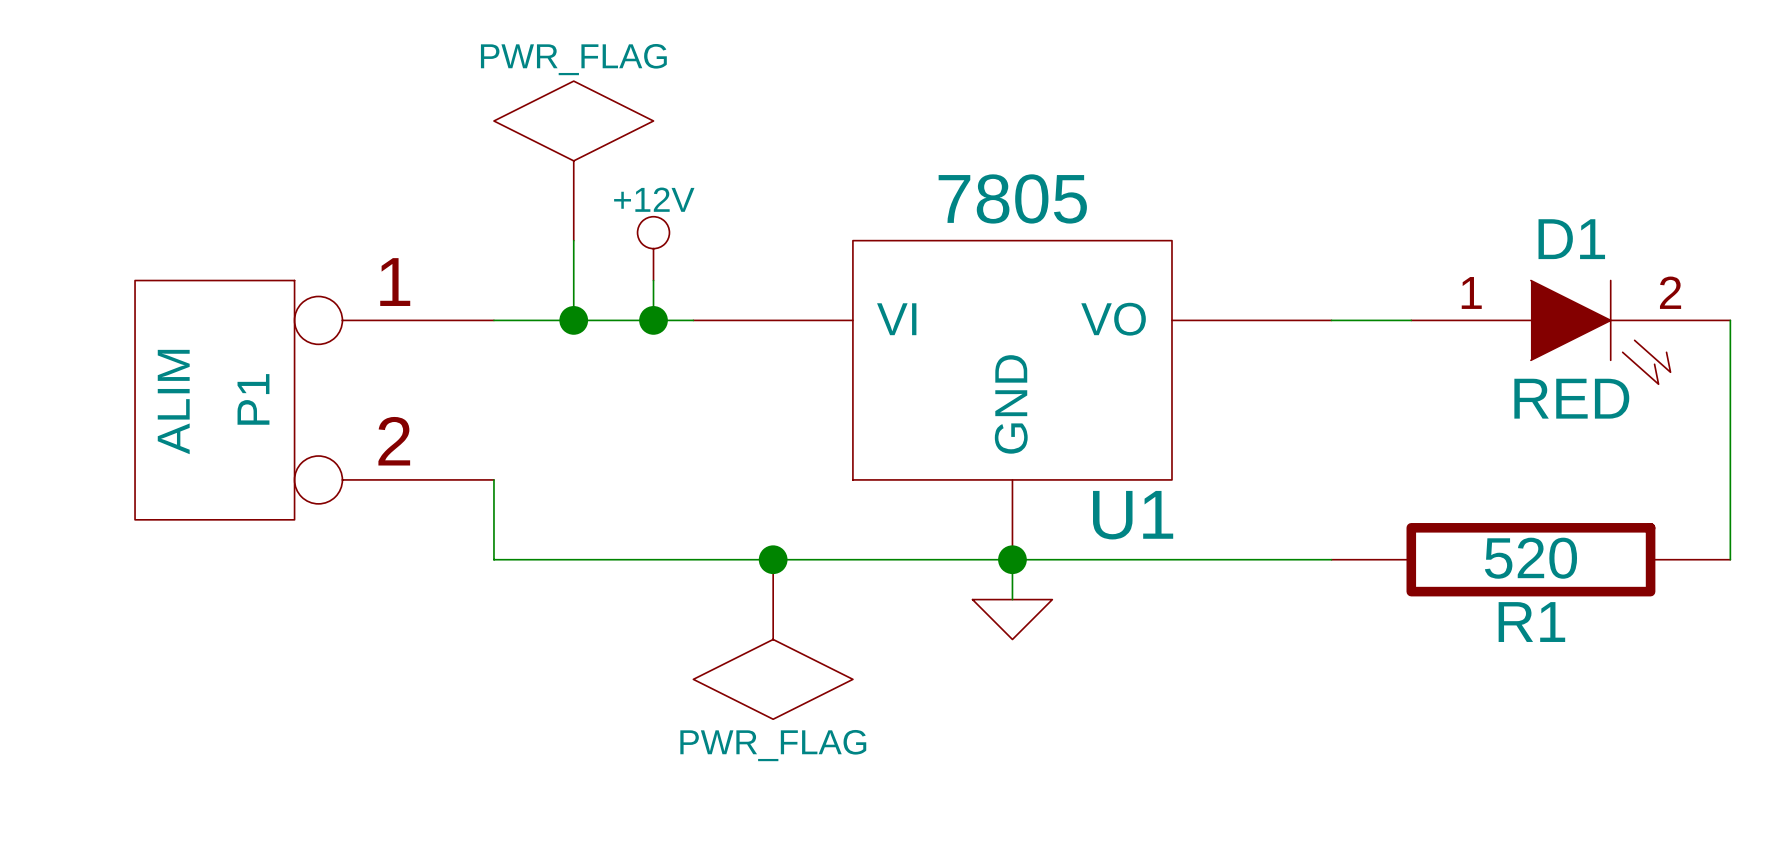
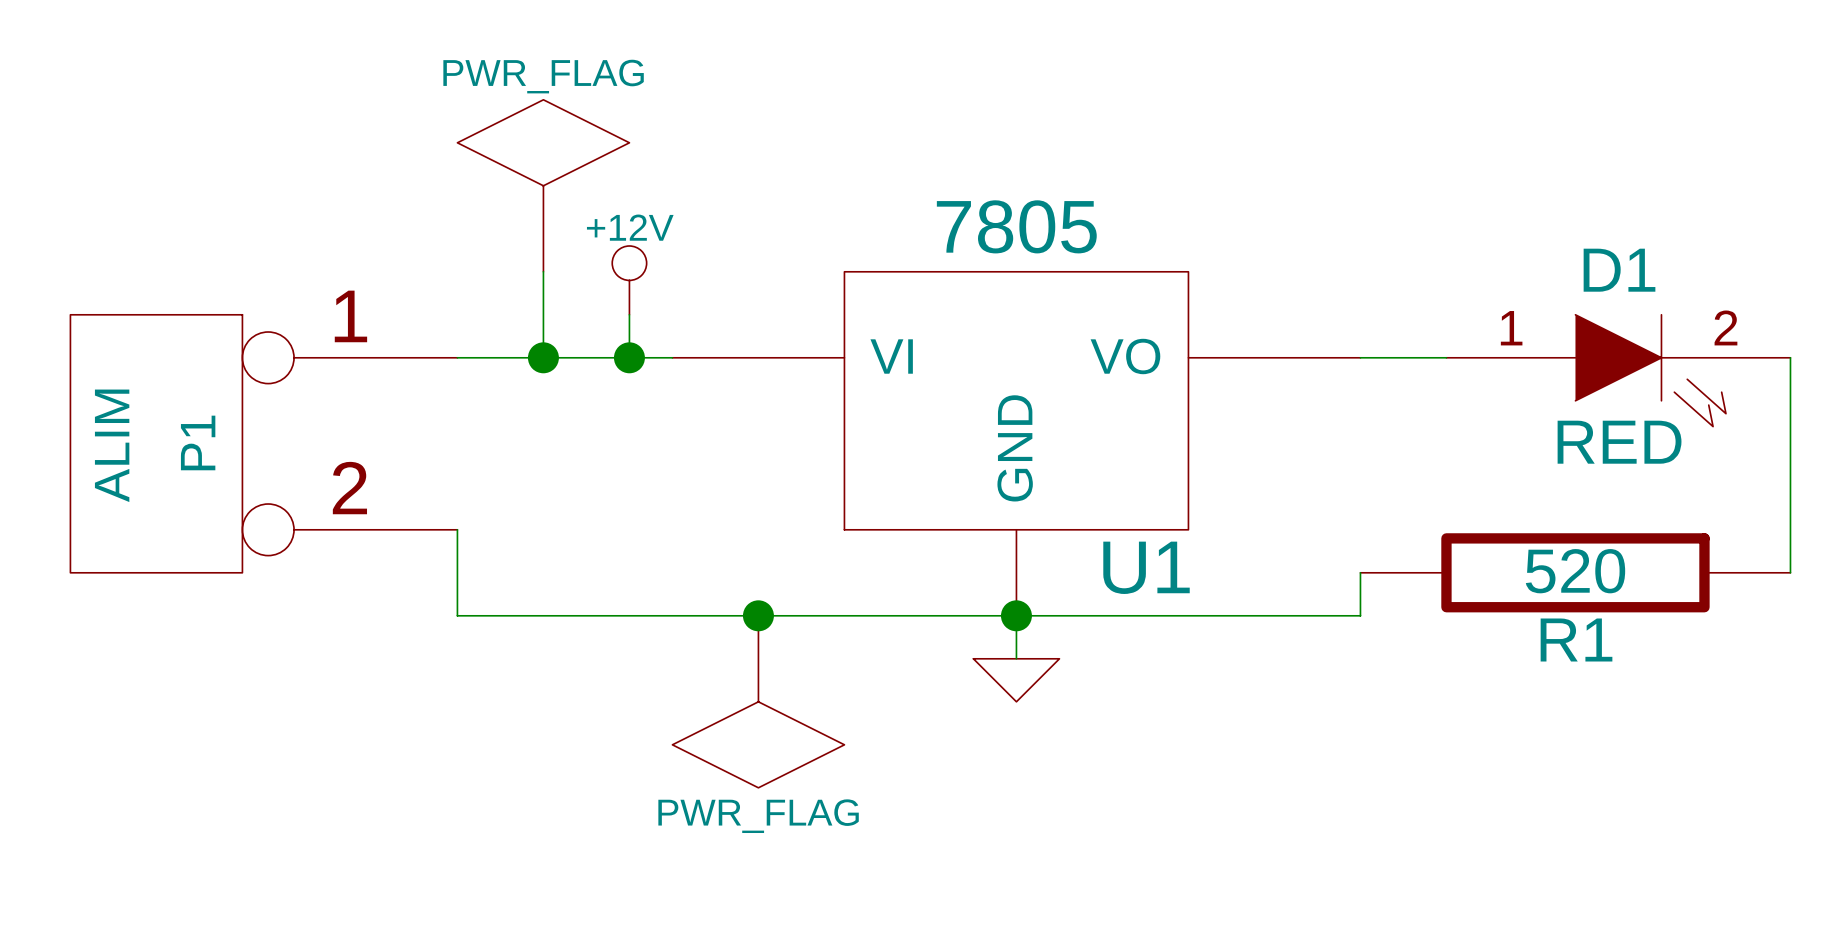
wire: (1730, 519) (1730, 559) -> (1360, 572) (1360, 615)
R1 position: (1530, 559) -> (1575, 572)

